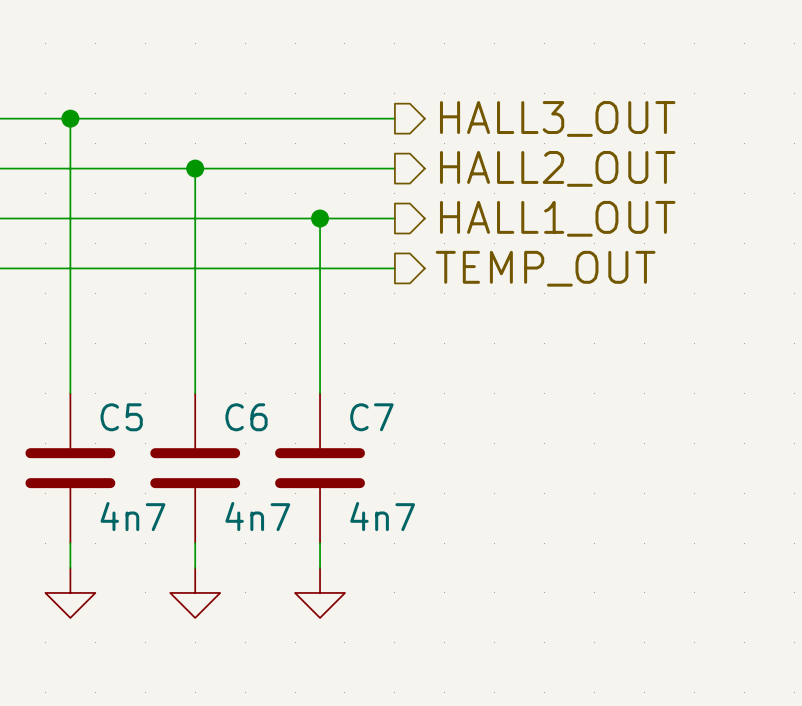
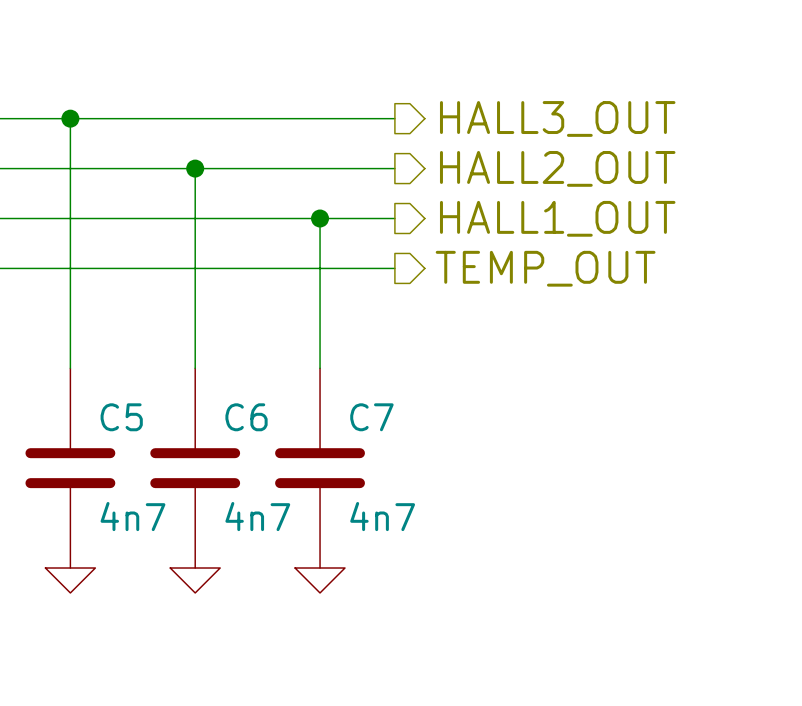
C5 symbol: [25, 393, 116, 544] -> [25, 368, 116, 569]
C6 symbol: [150, 393, 241, 544] -> [150, 368, 241, 569]
C7 symbol: [275, 393, 365, 544] -> [275, 368, 365, 569]
power symbol shape: [45, 568, 96, 618] -> [45, 568, 96, 593]
power symbol shape: [170, 568, 221, 618] -> [170, 568, 221, 593]
power symbol shape: [295, 568, 345, 618] -> [295, 568, 345, 593]

